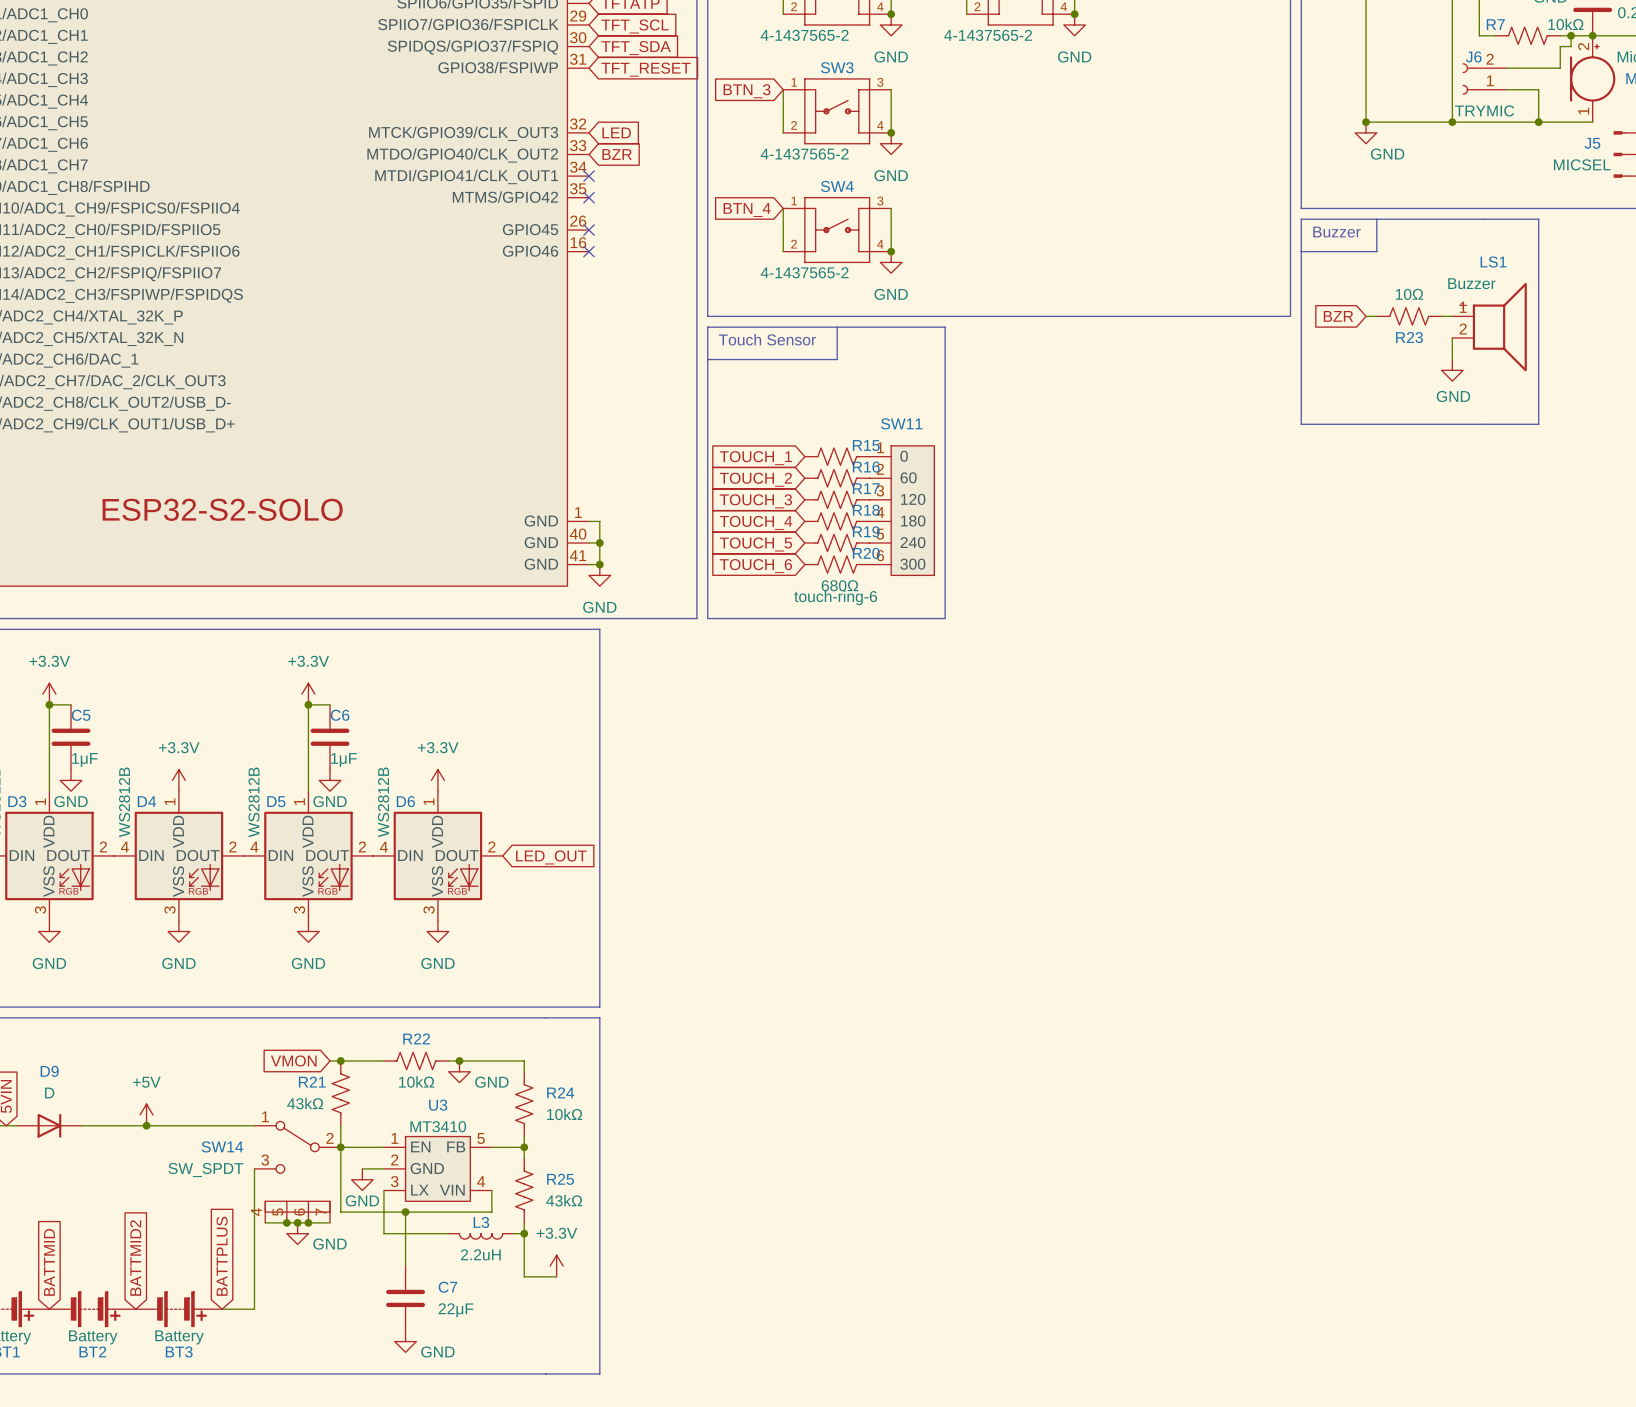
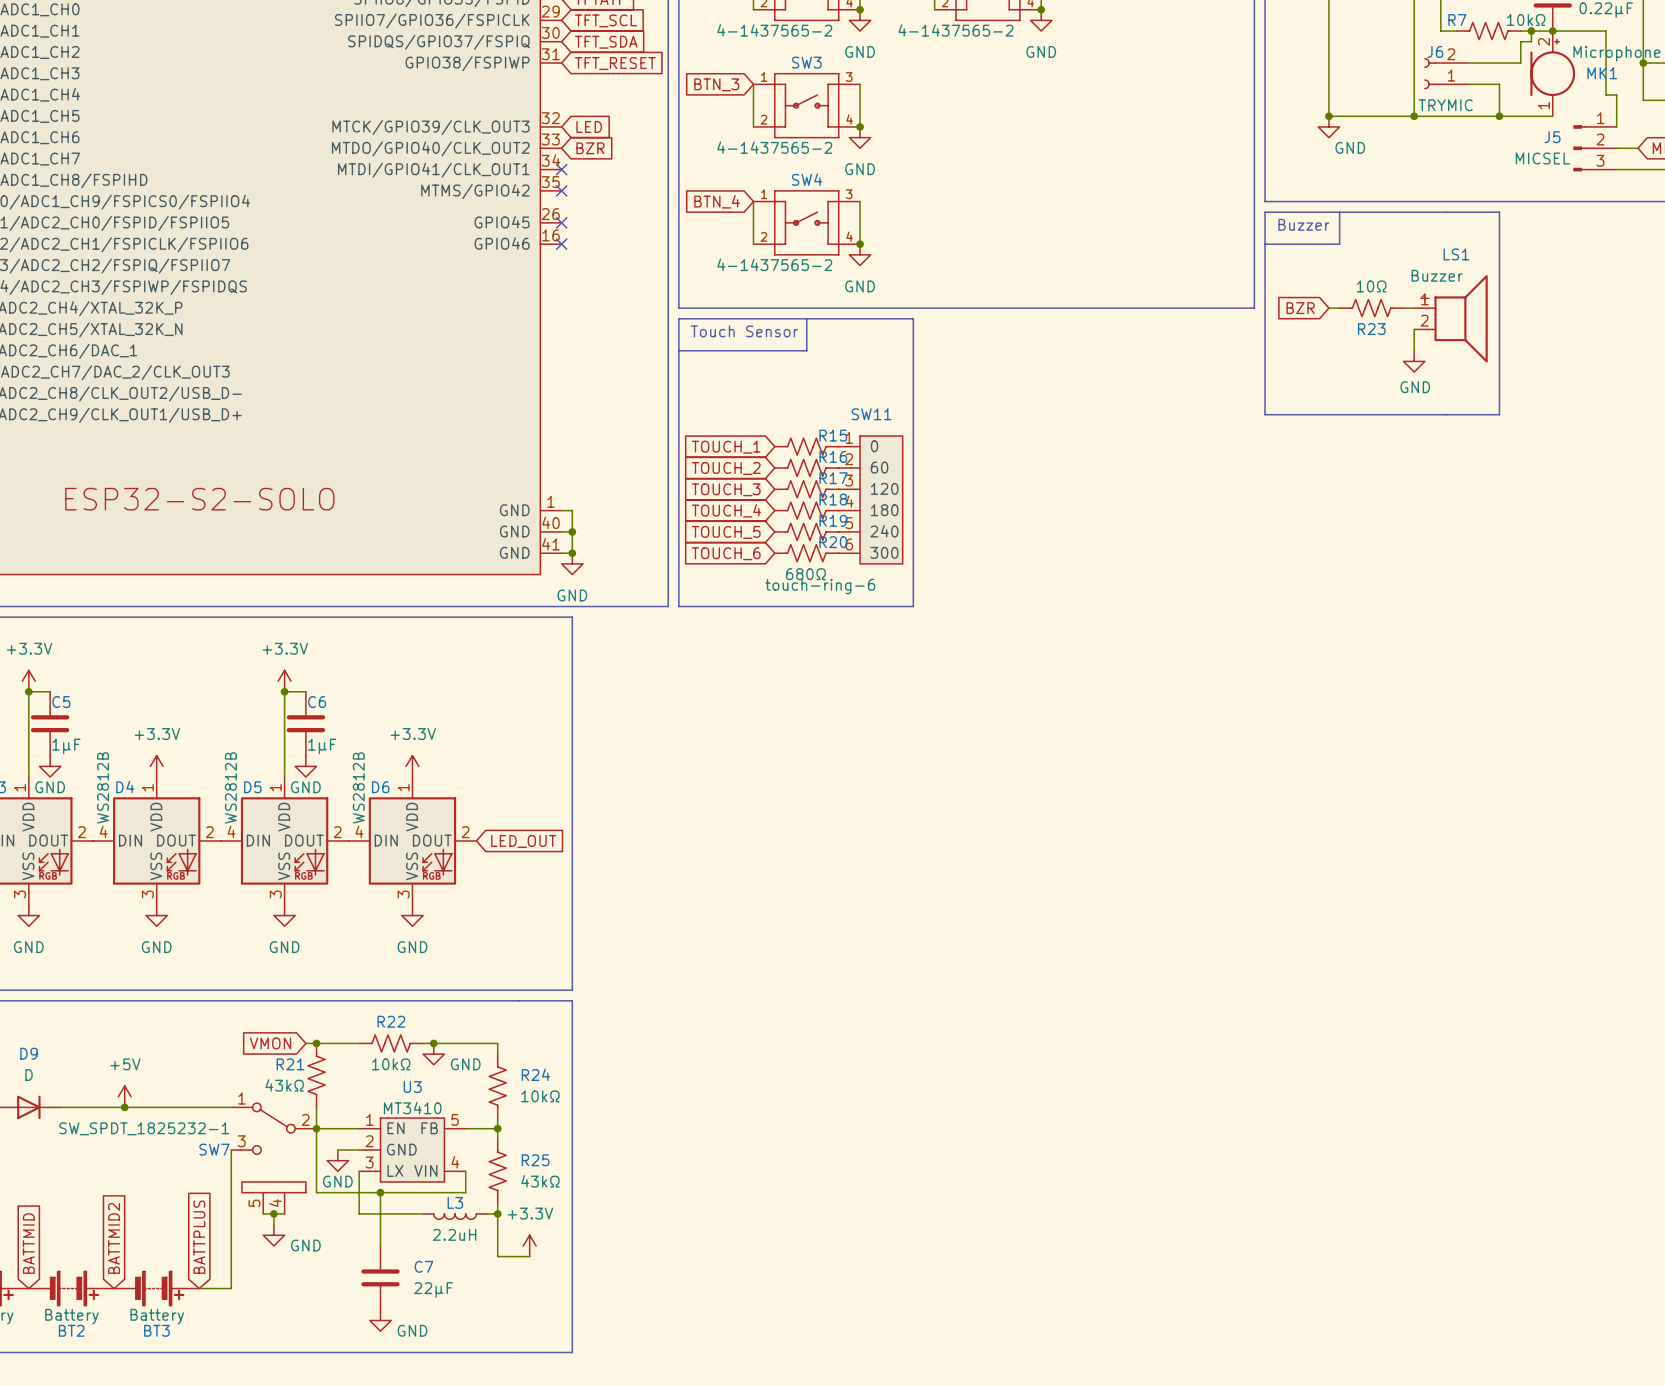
SW14: SW_SPDT (297, 1172) -> none
SW7: none -> SW_SPDT_1825232-1 (273, 1158)
wire: (265, 1222) (330, 1222) -> none
junction: (286, 1222) -> none
junction: (297, 1222) -> none
junction: (308, 1222) -> none
wire: none -> (273, 1213) (273, 1224)
junction: none -> (273, 1213)
power symbol position: GND (297, 1233) -> GND (273, 1235)

